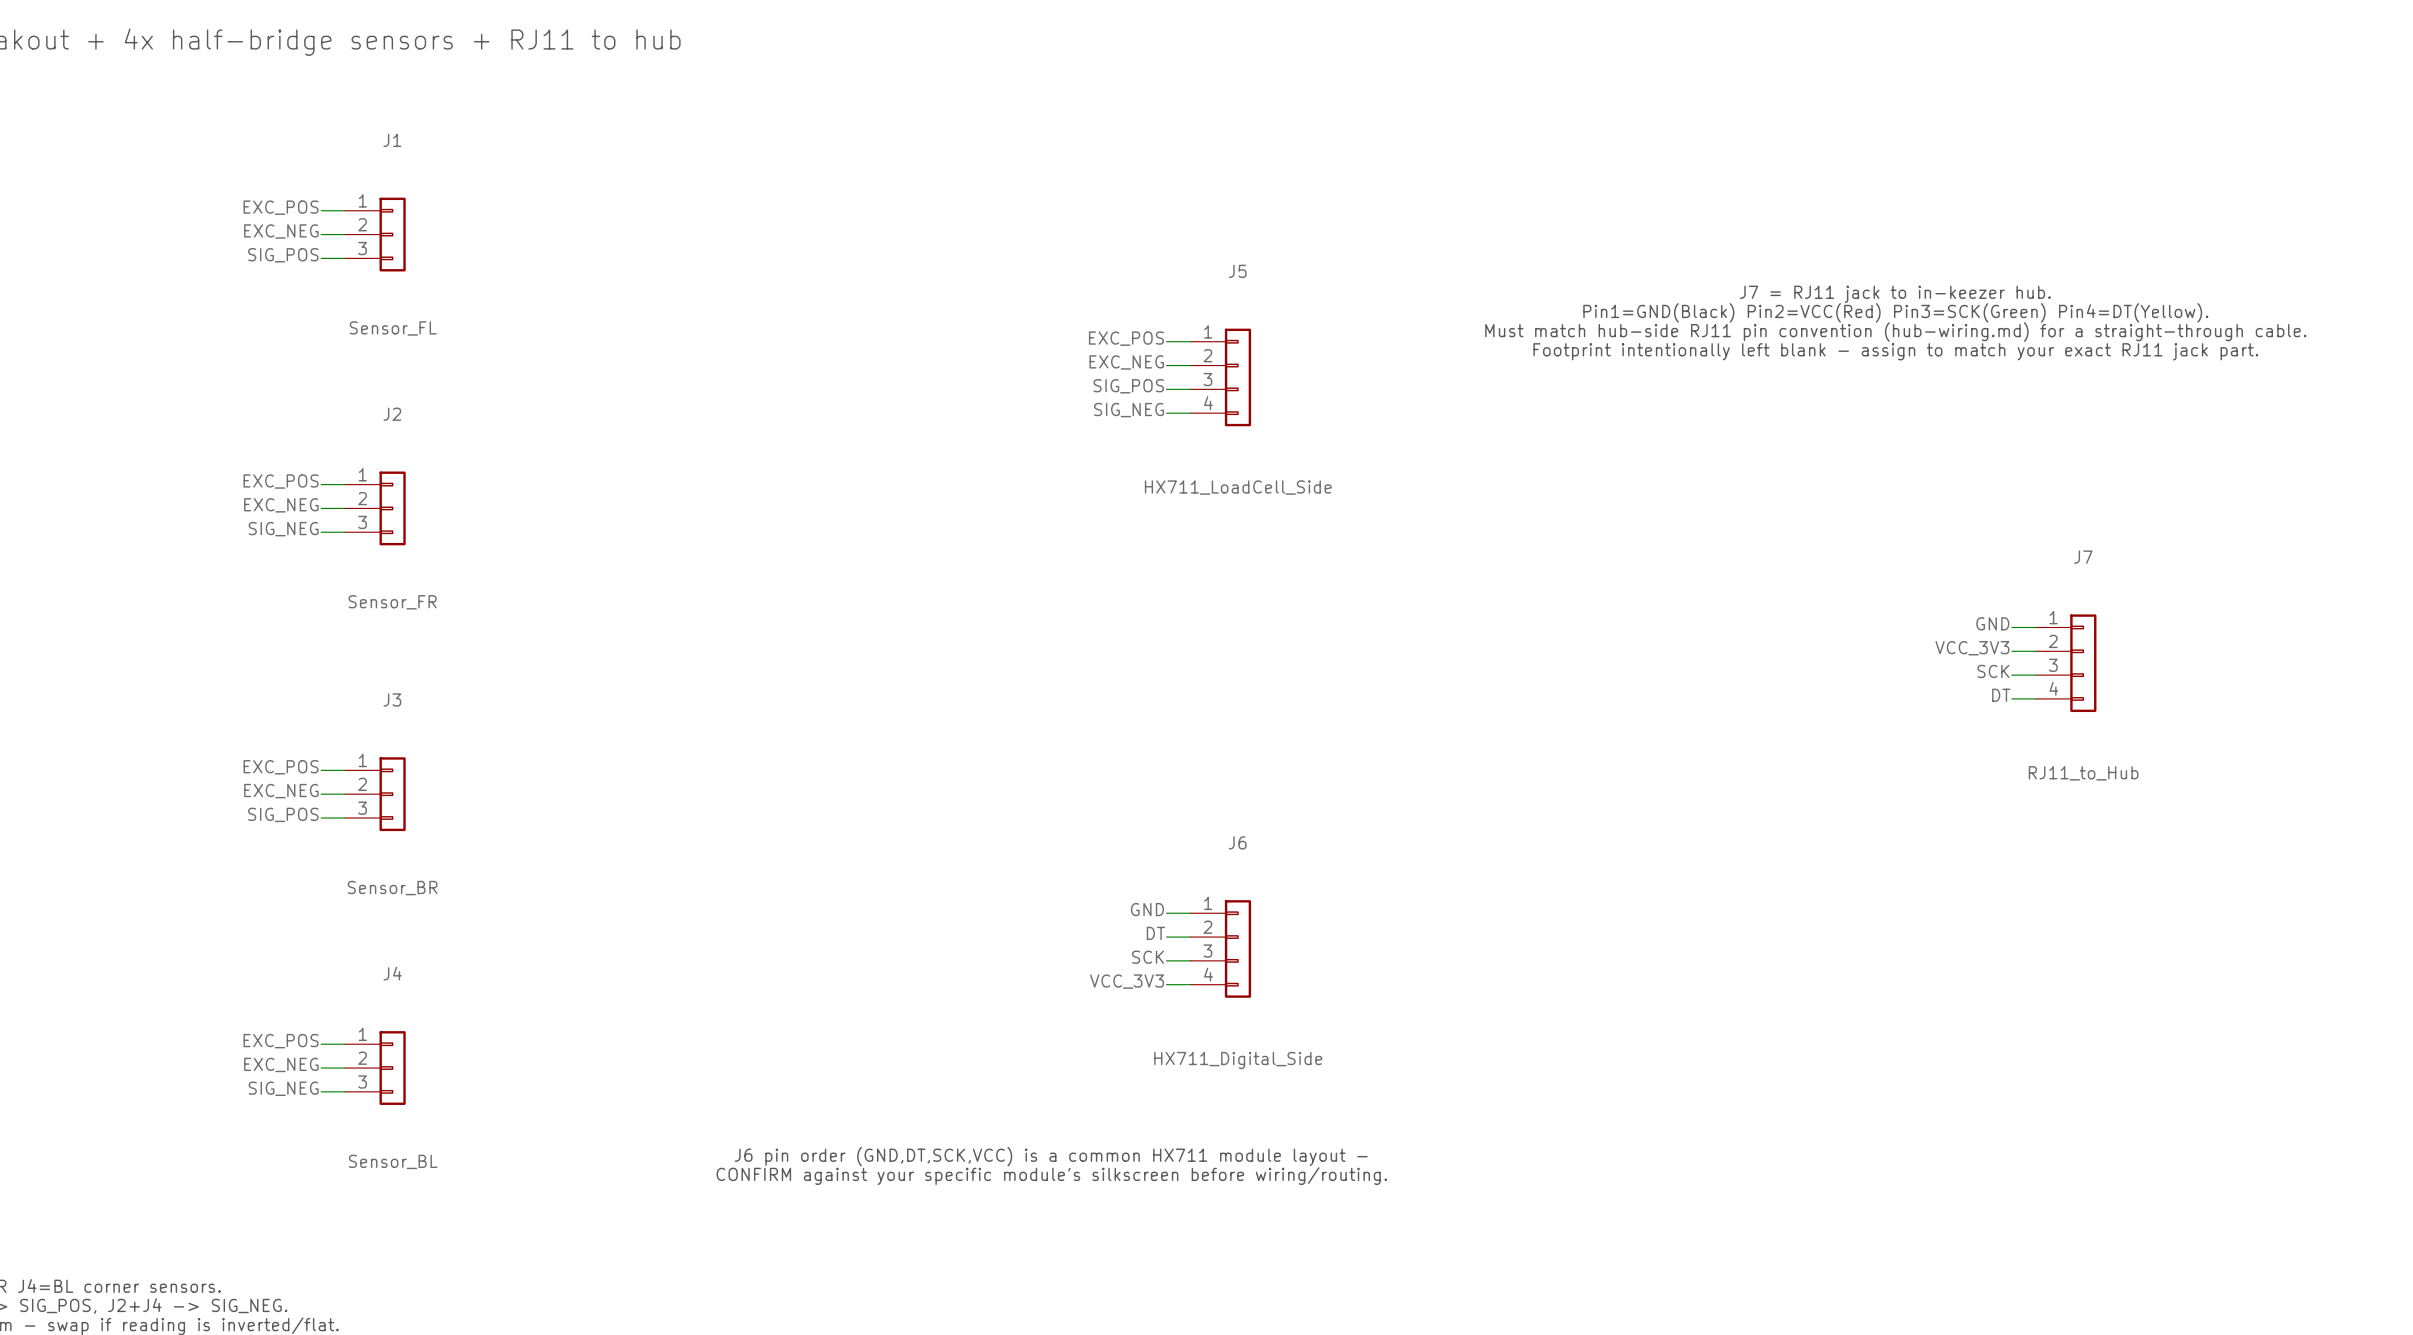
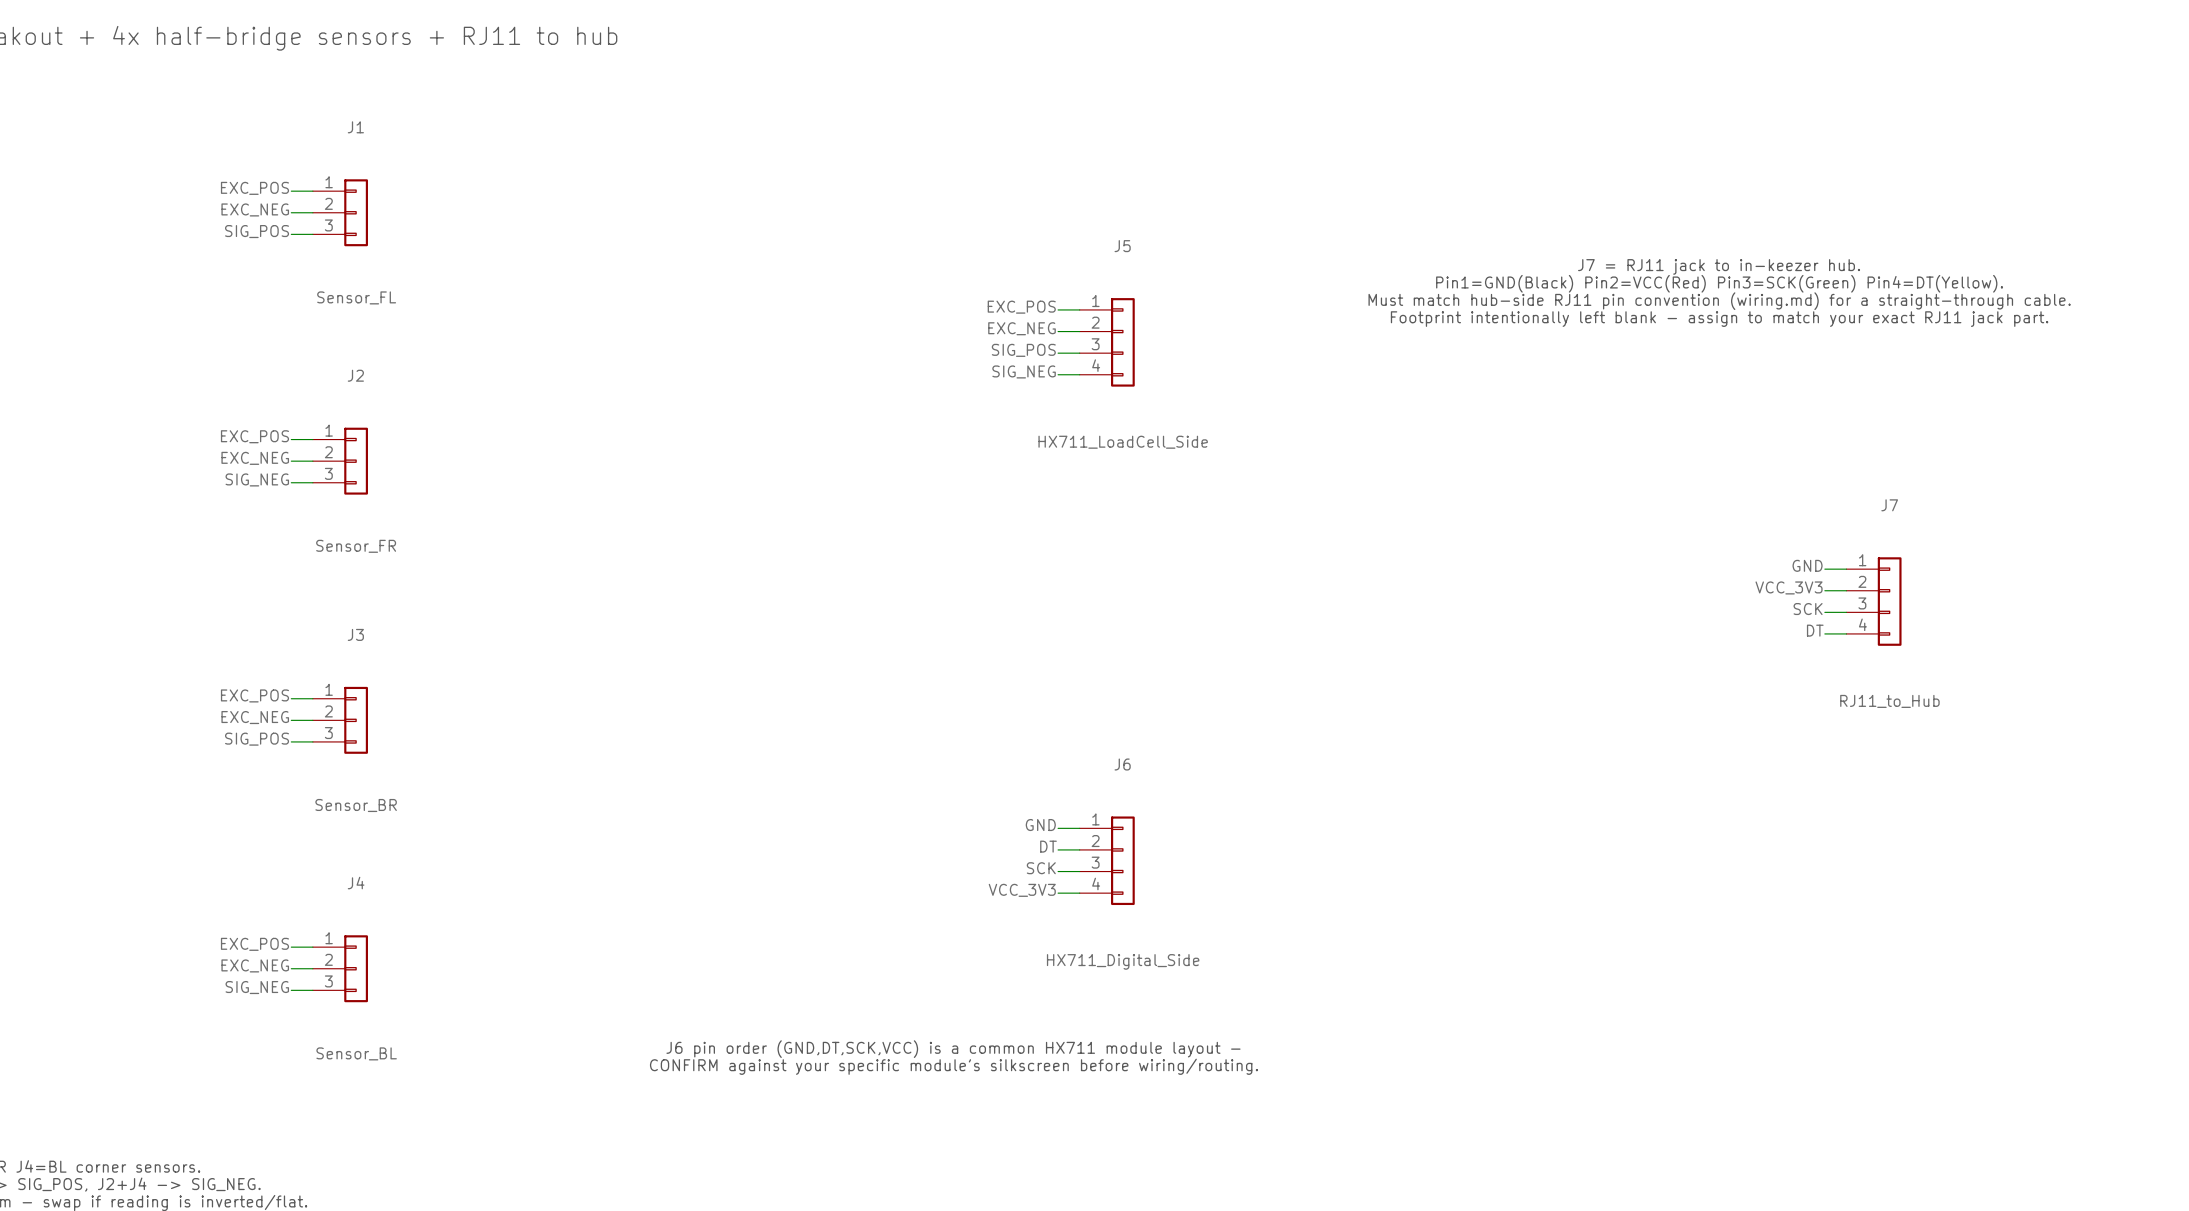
text: Must match hub-side RJ11 pin convention (hub-wiring.md) for a straight-through cable. (1895, 332) -> Must match hub-side RJ11 pin convention (wiring.md) for a straight-through cable. (1719, 301)

